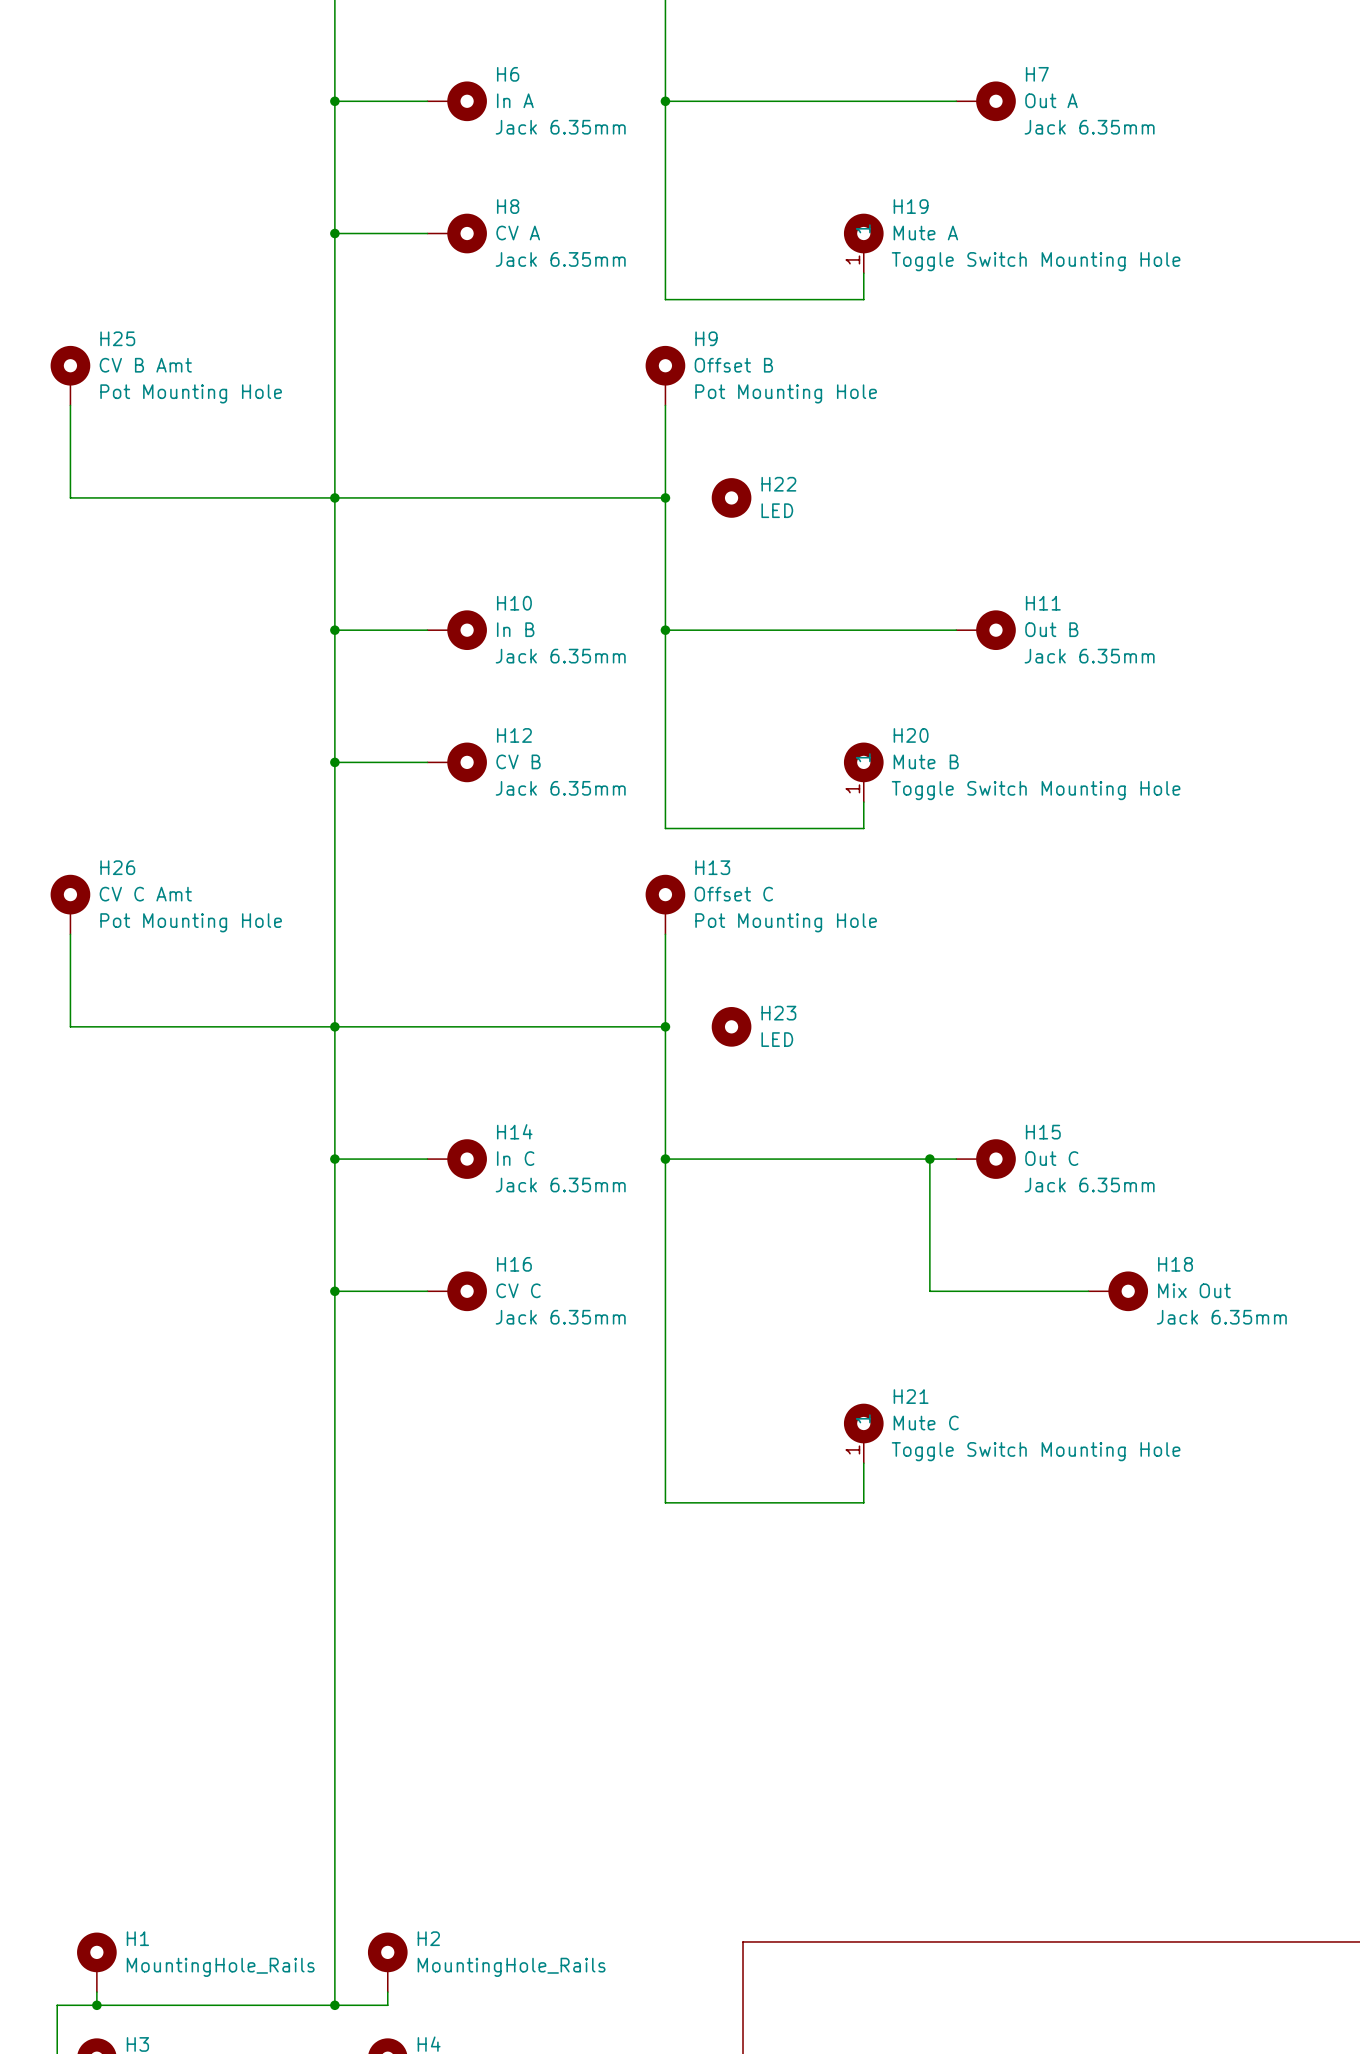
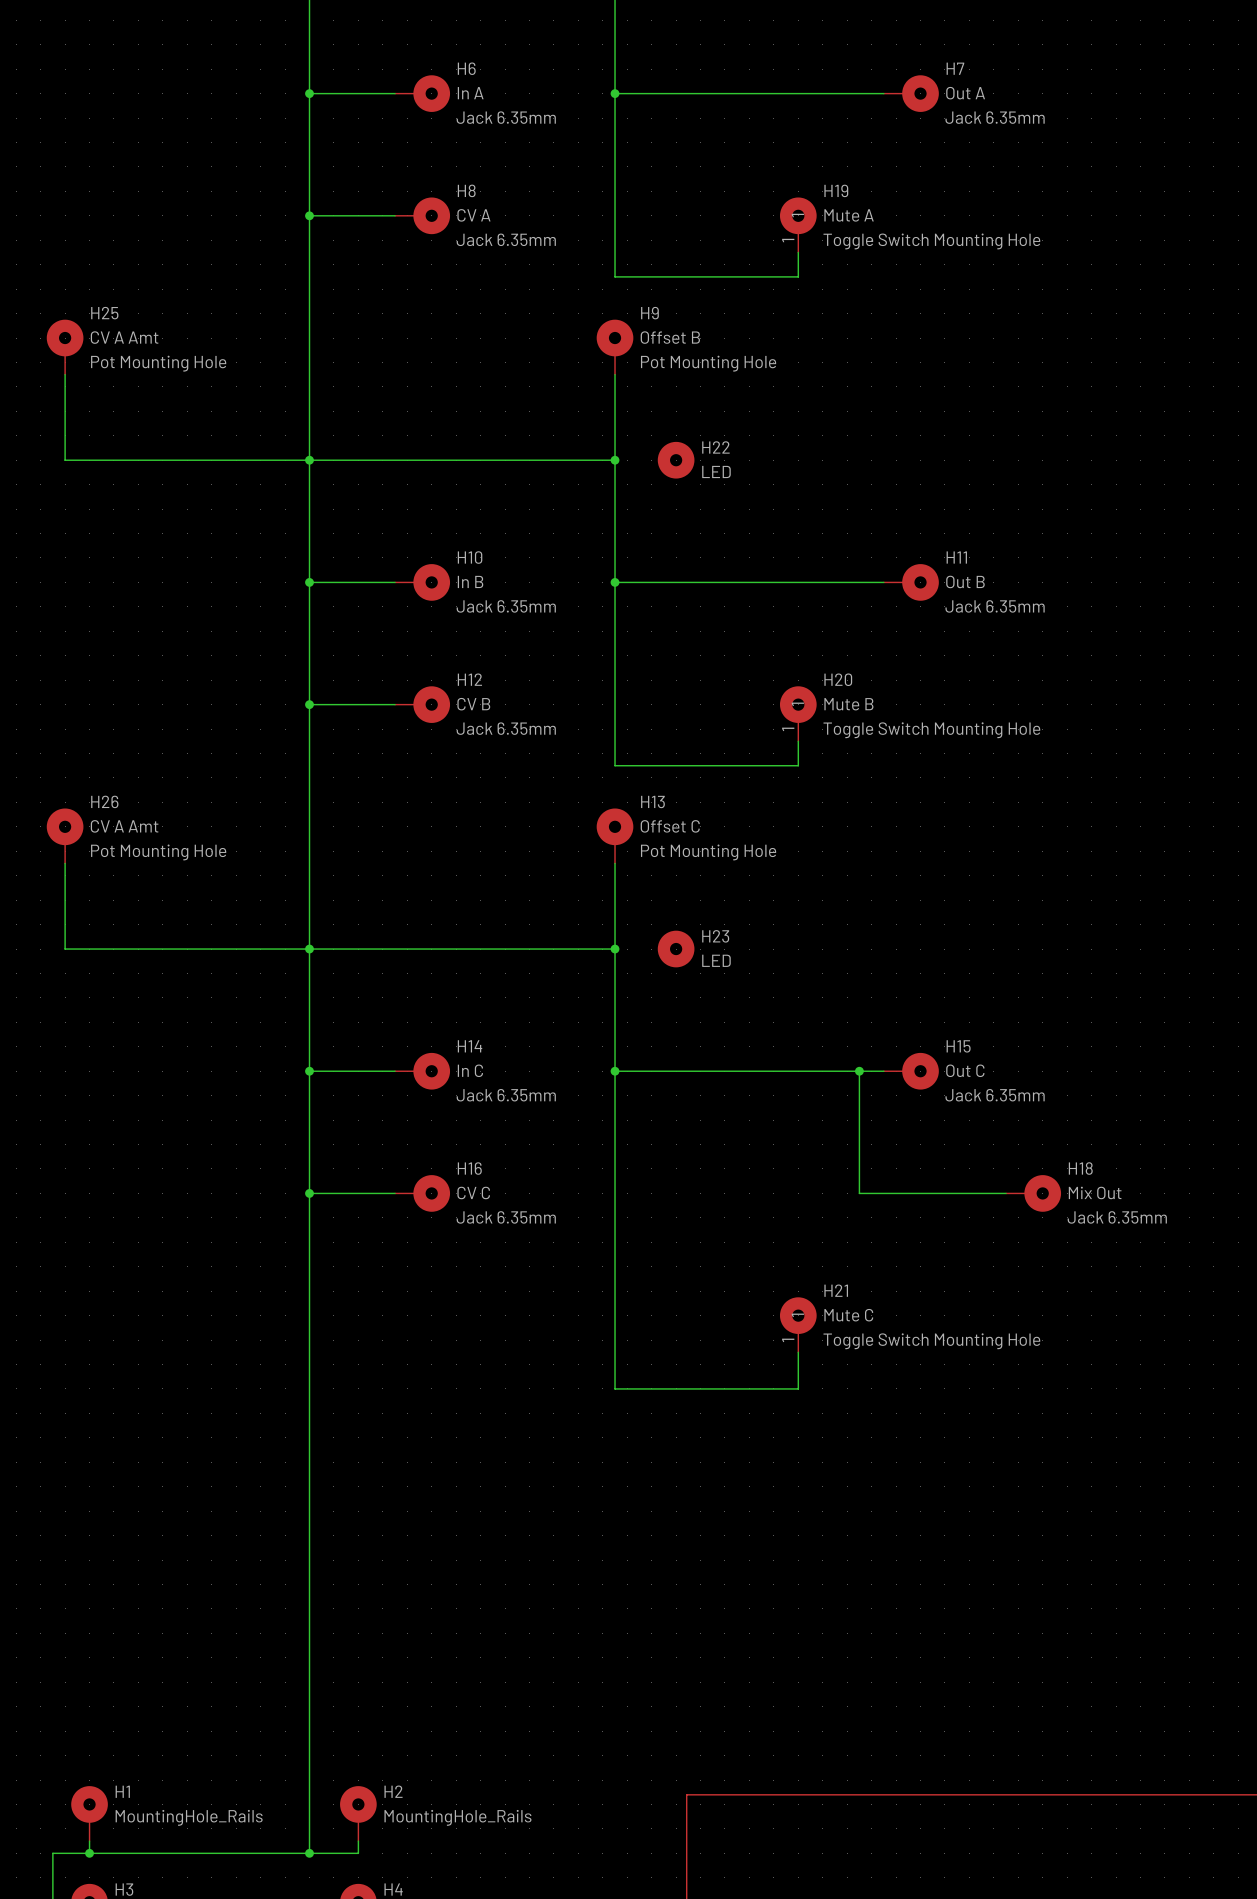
H25 value: CV B Amt (145, 365) -> CV A Amt (124, 337)
H26 value: CV C Amt (145, 894) -> CV A Amt (124, 826)

